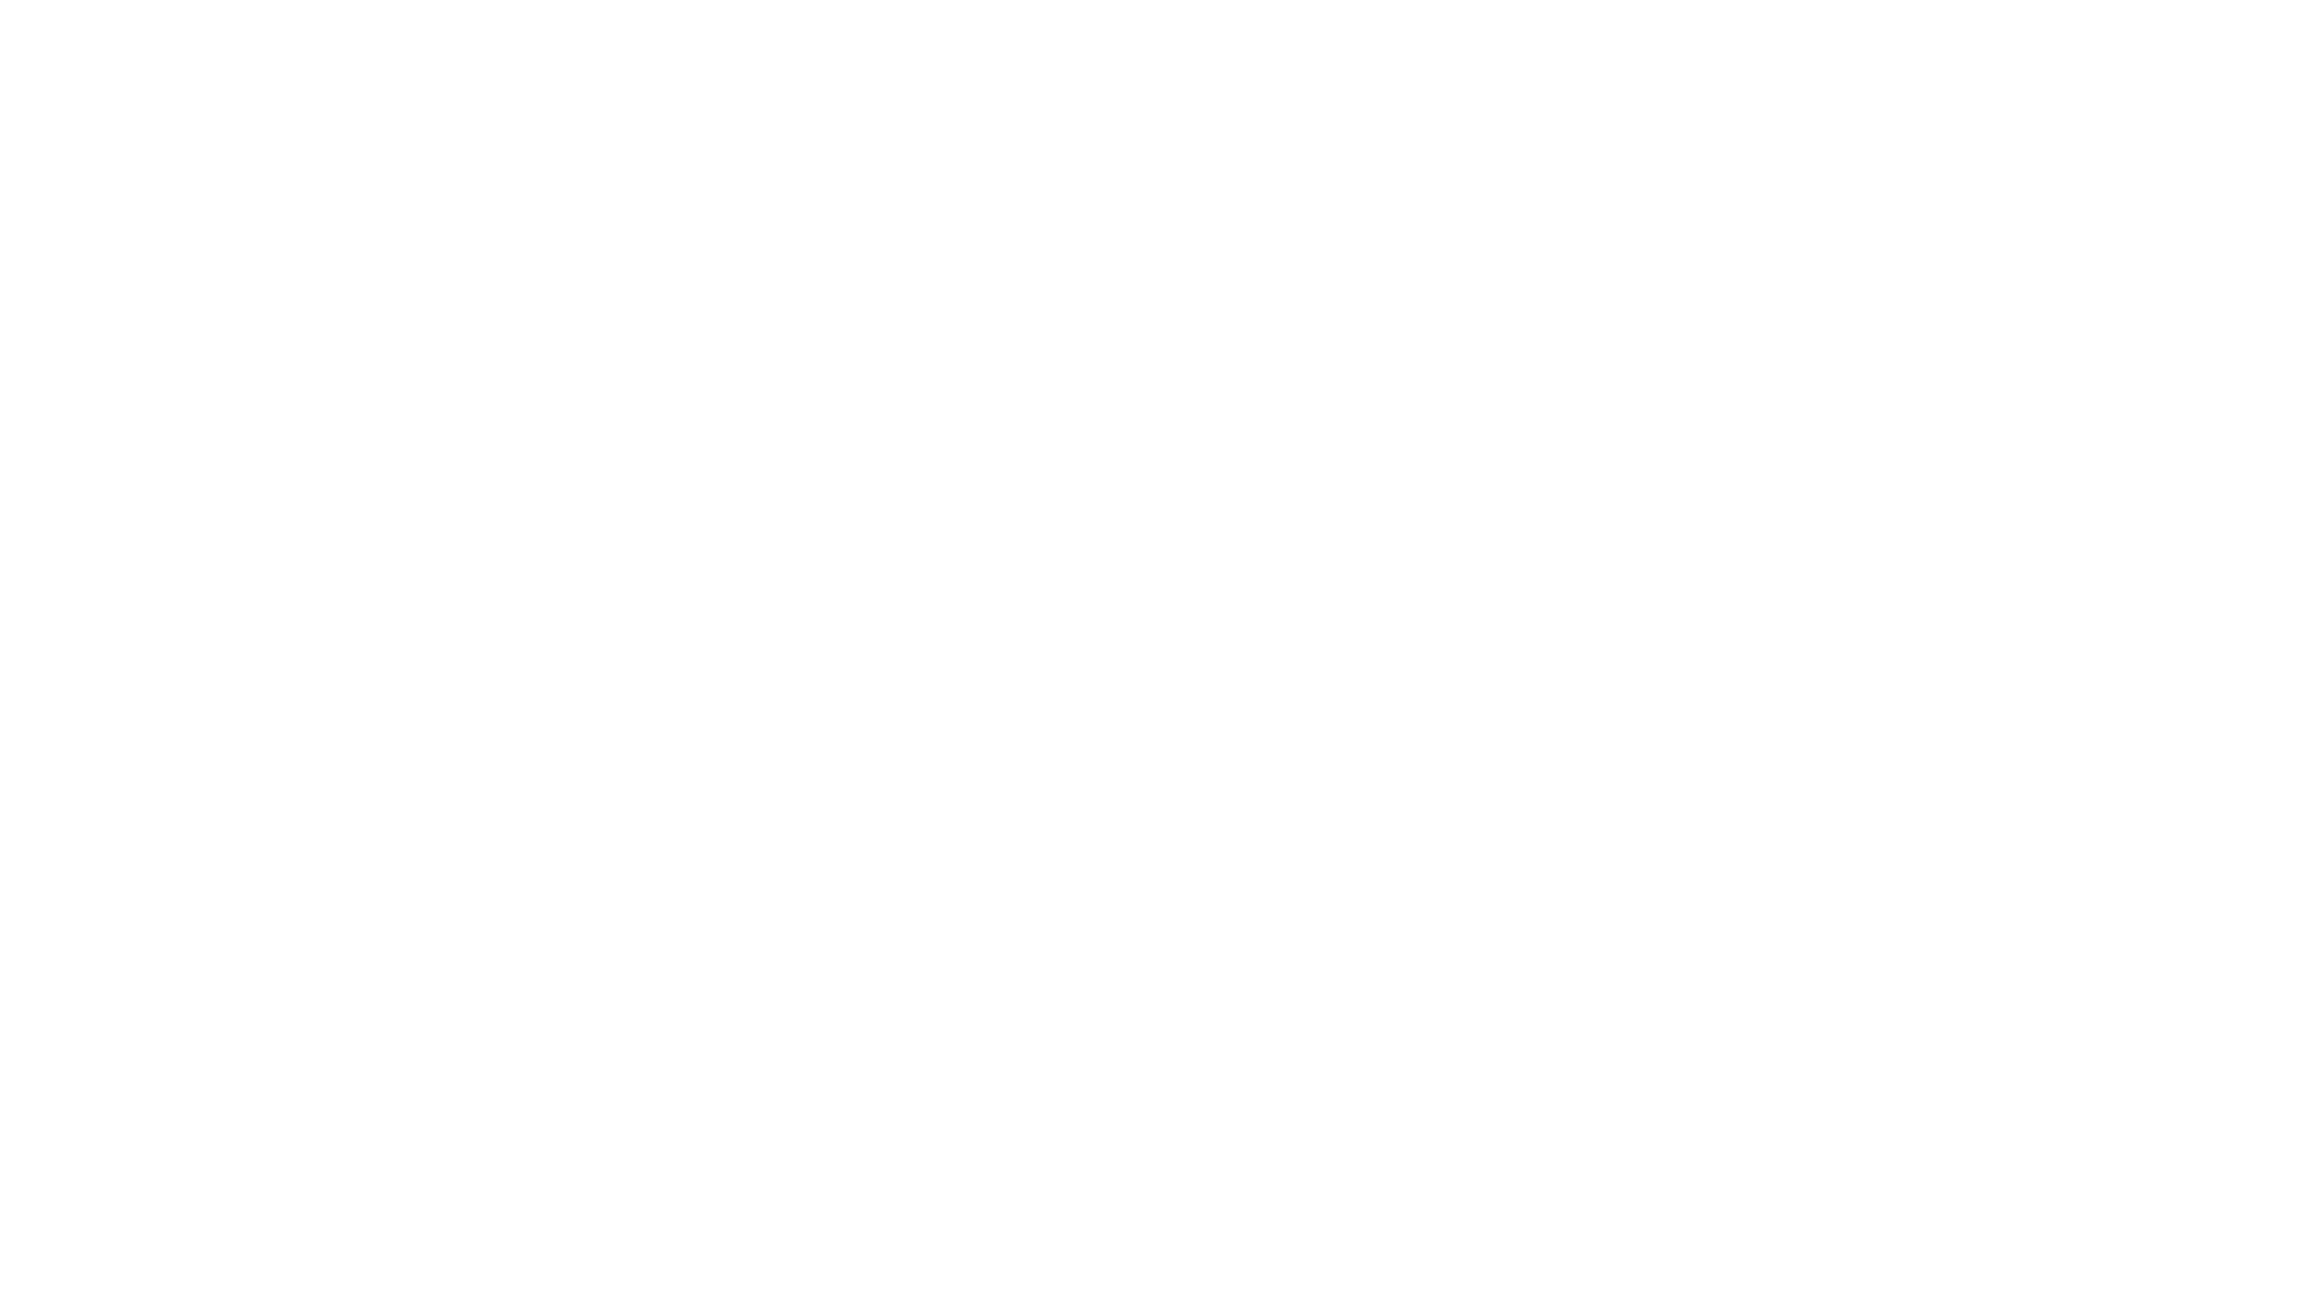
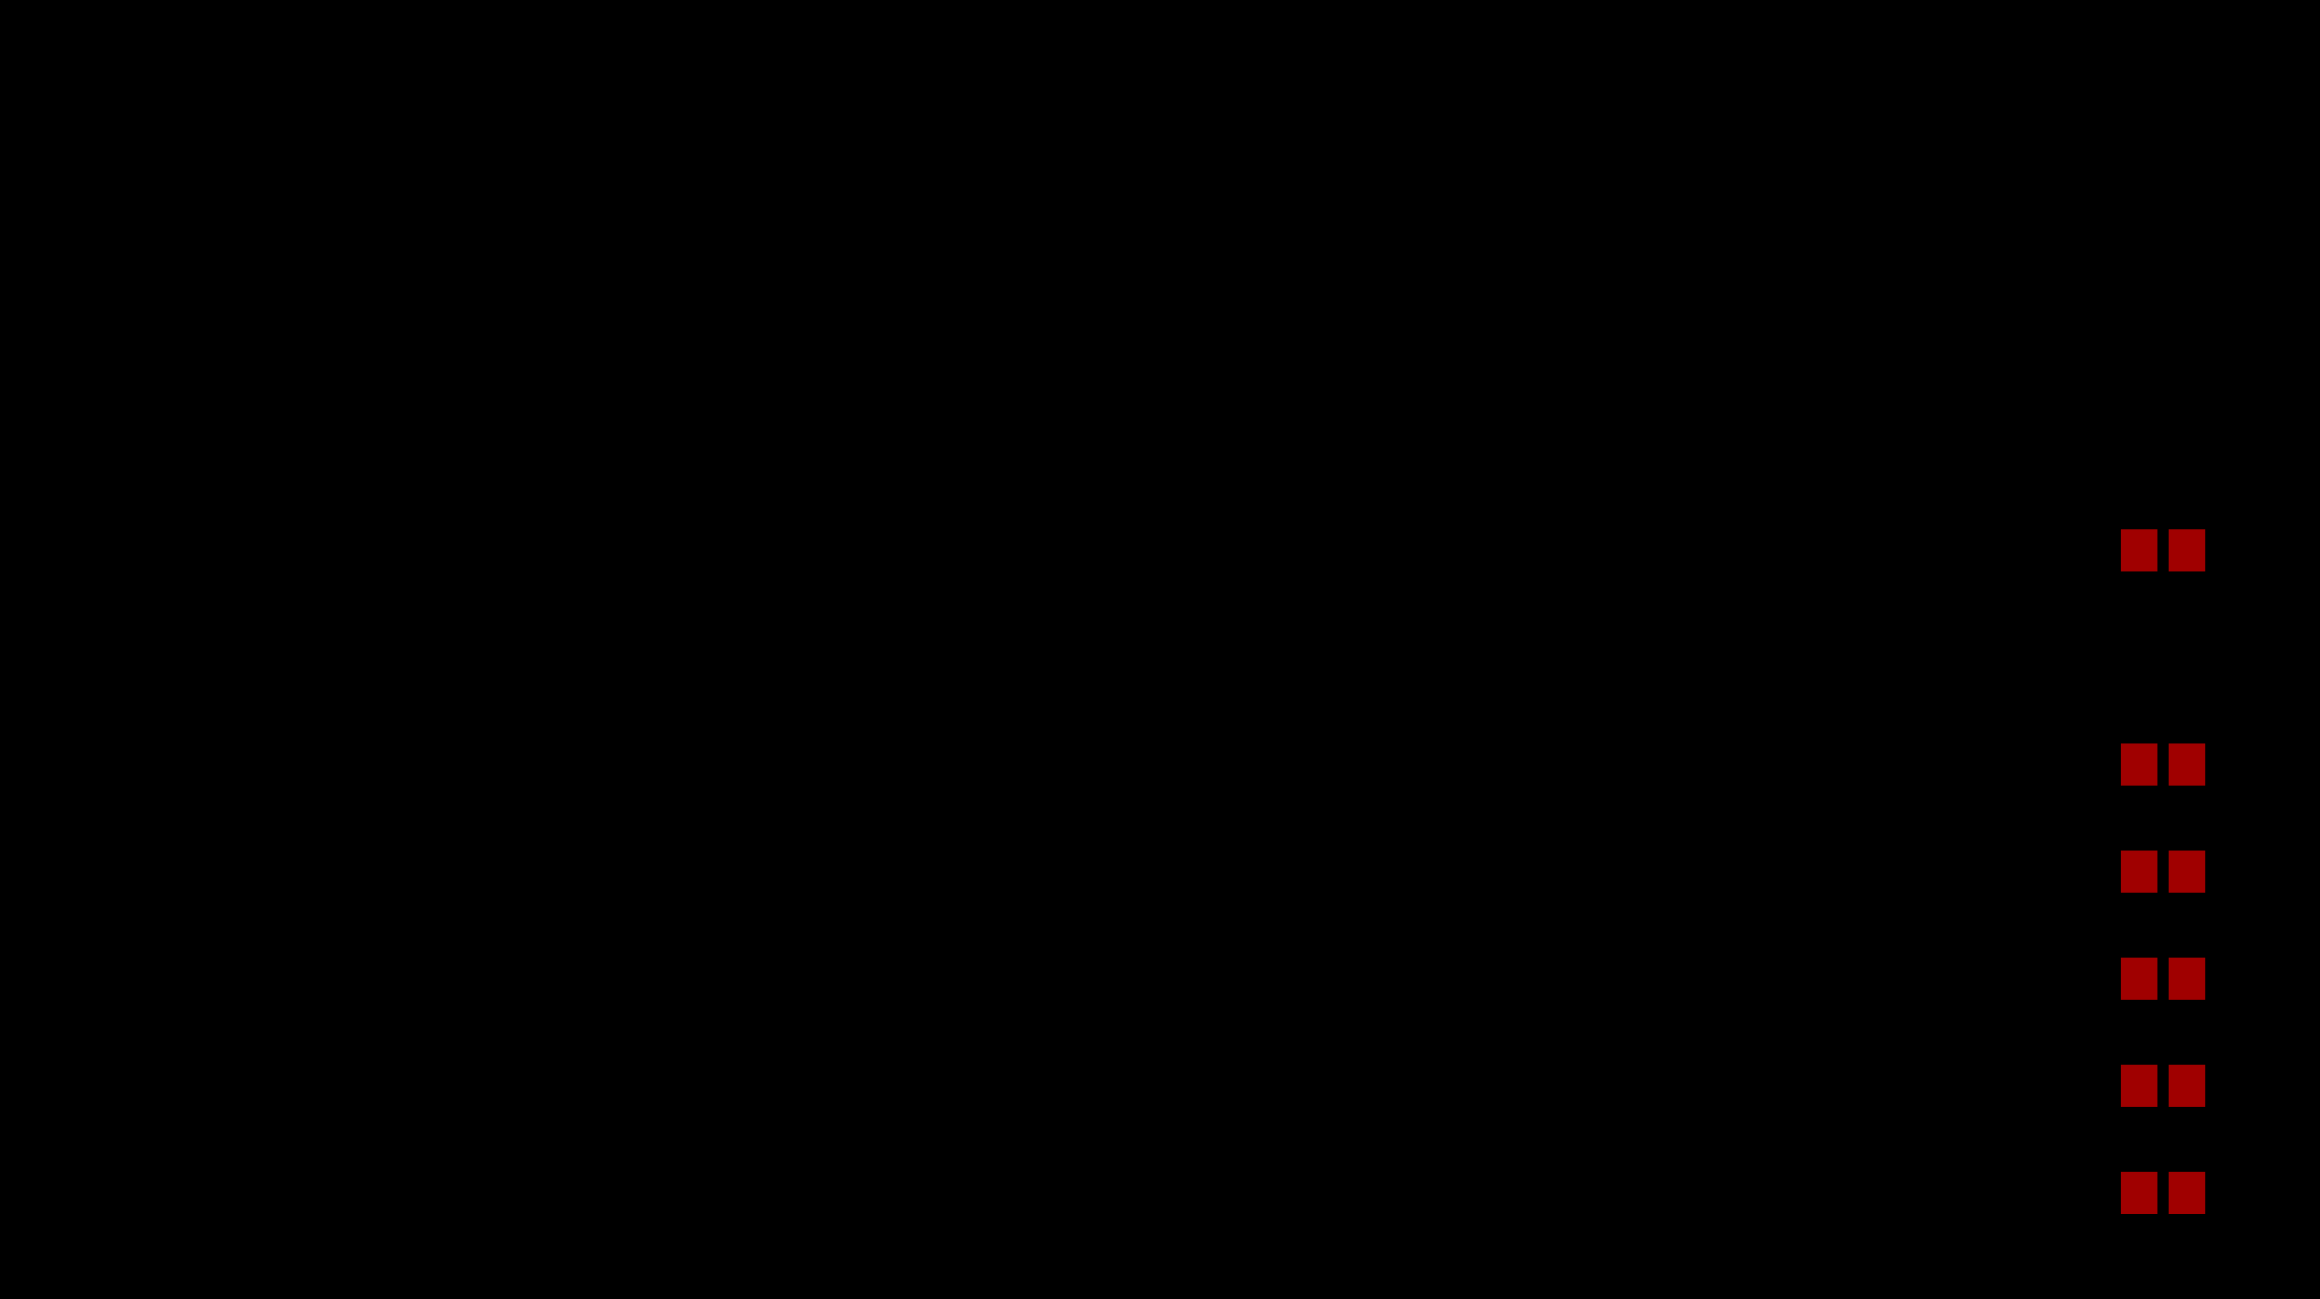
part: none -> (2163, 550)
part: none -> (2163, 764)
part: none -> (2163, 871)
part: none -> (2163, 978)
part: none -> (2163, 1085)
part: none -> (2163, 1192)

